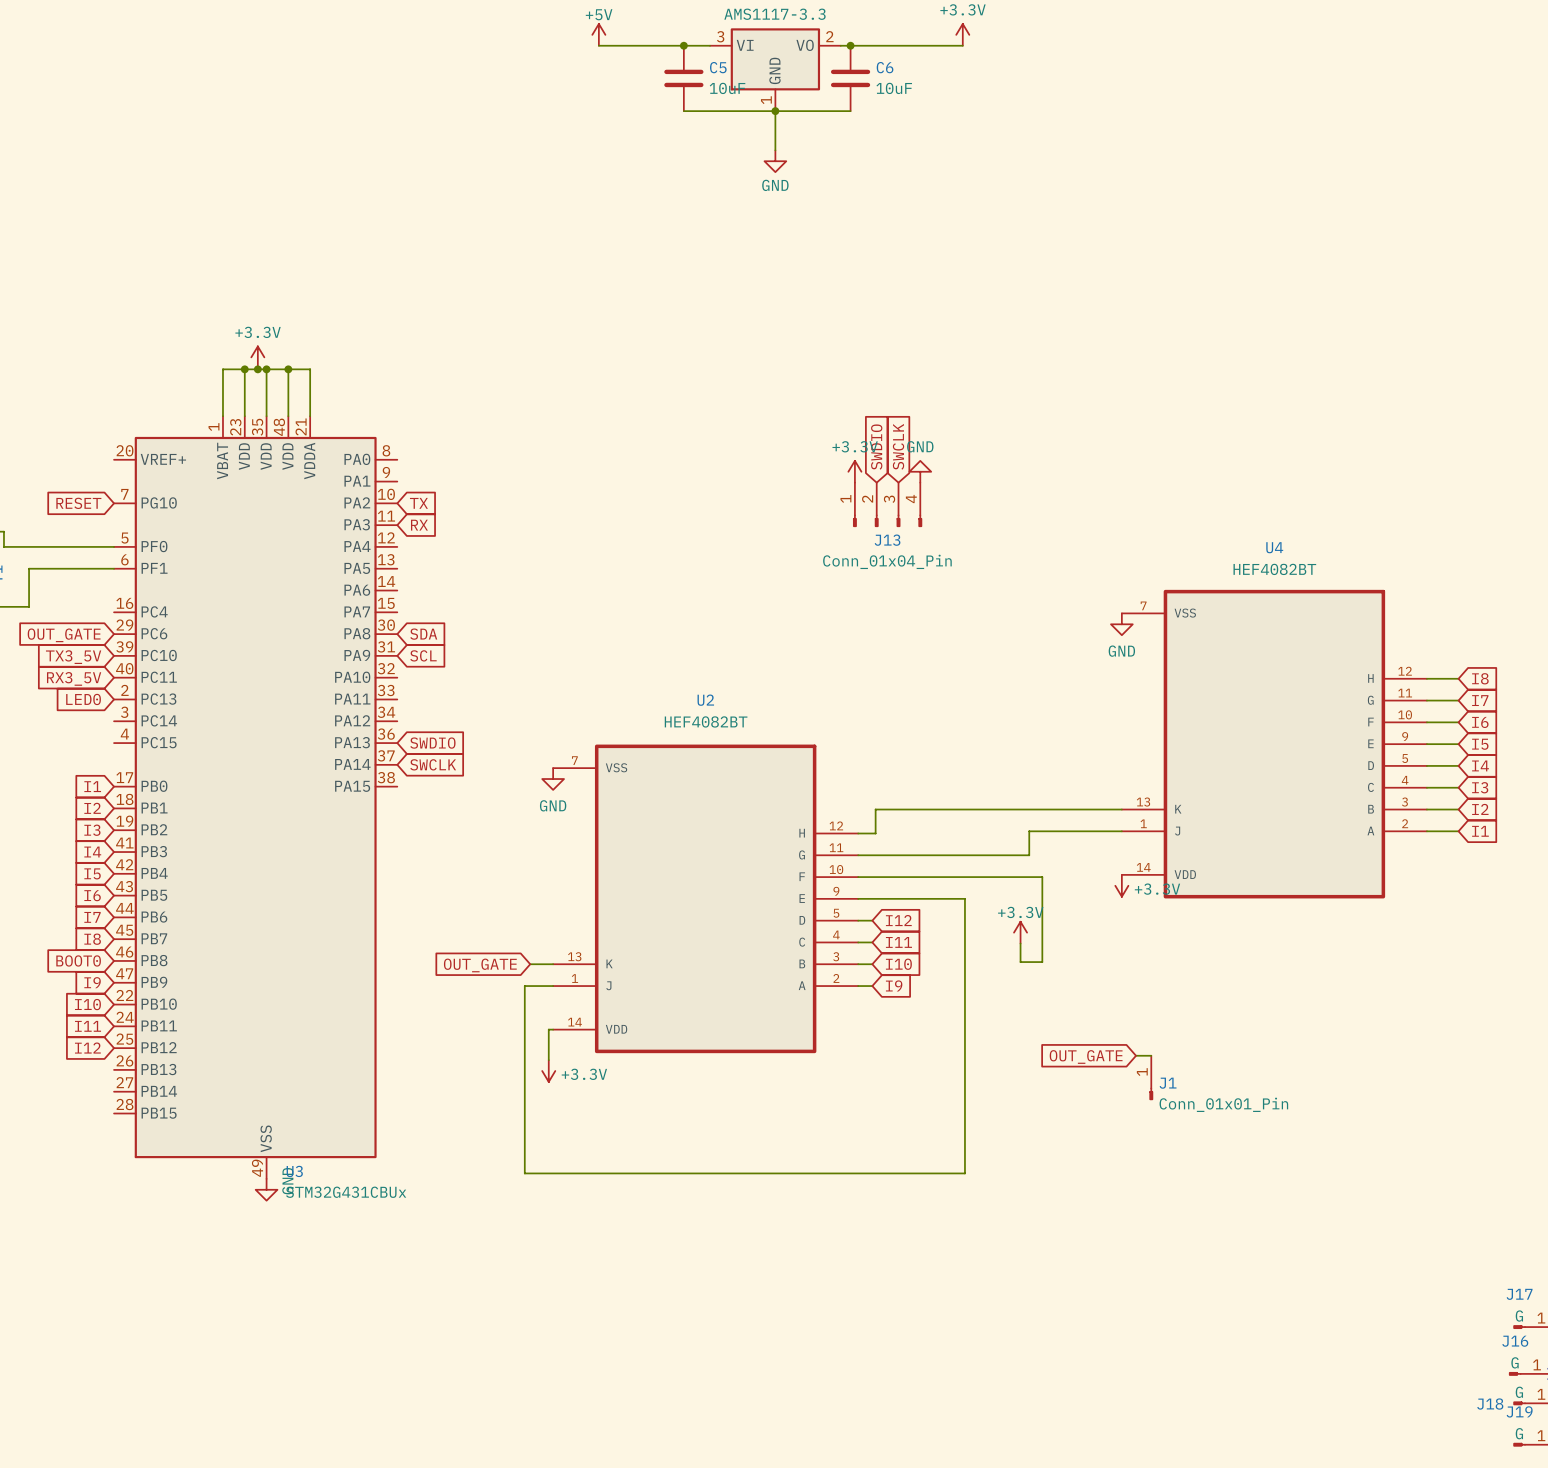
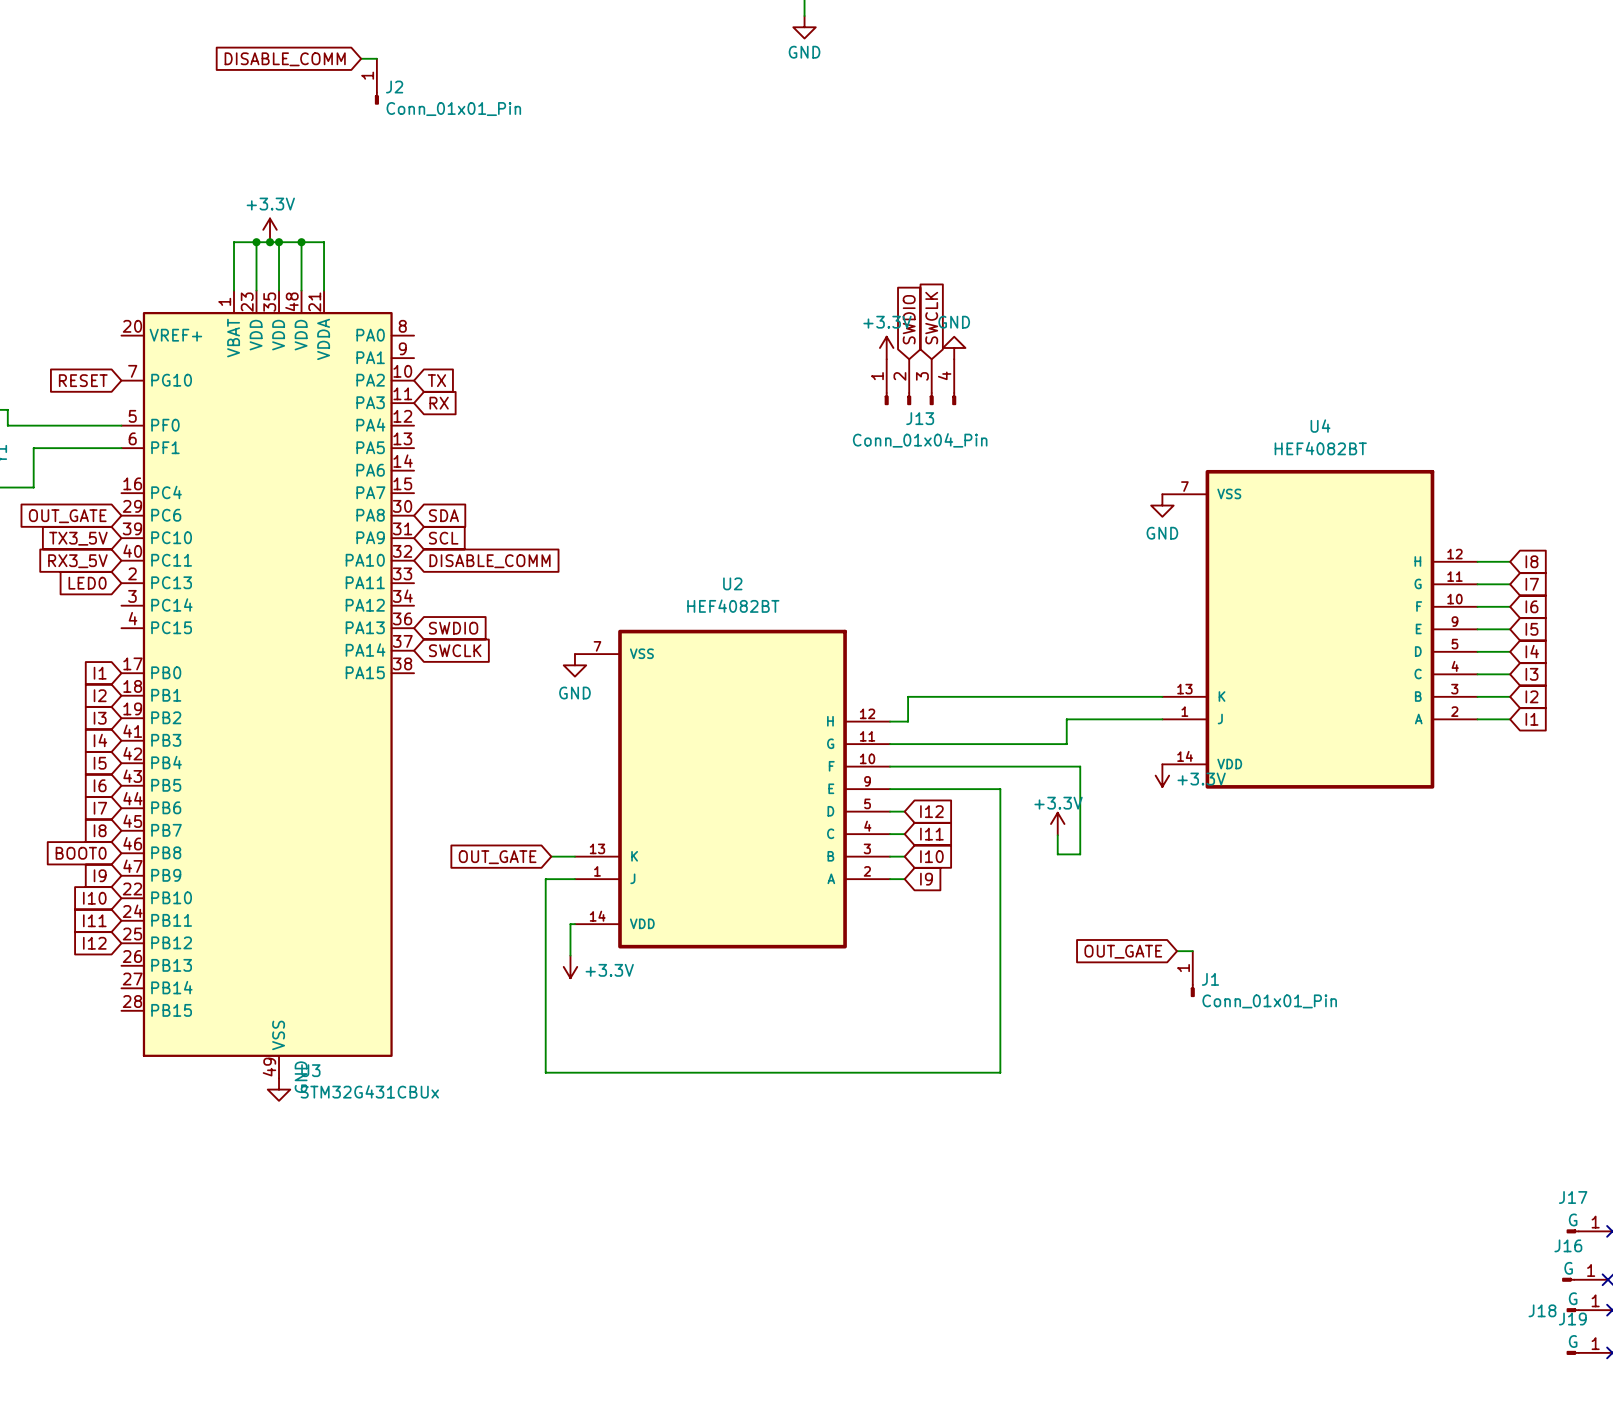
wire: none -> (361, 58) (376, 58)
global label: none -> DISABLE_COMM (285, 59)
J2: none -> Conn_01x01_Pin (376, 81)
global label: none -> DISABLE_COMM (490, 561)

